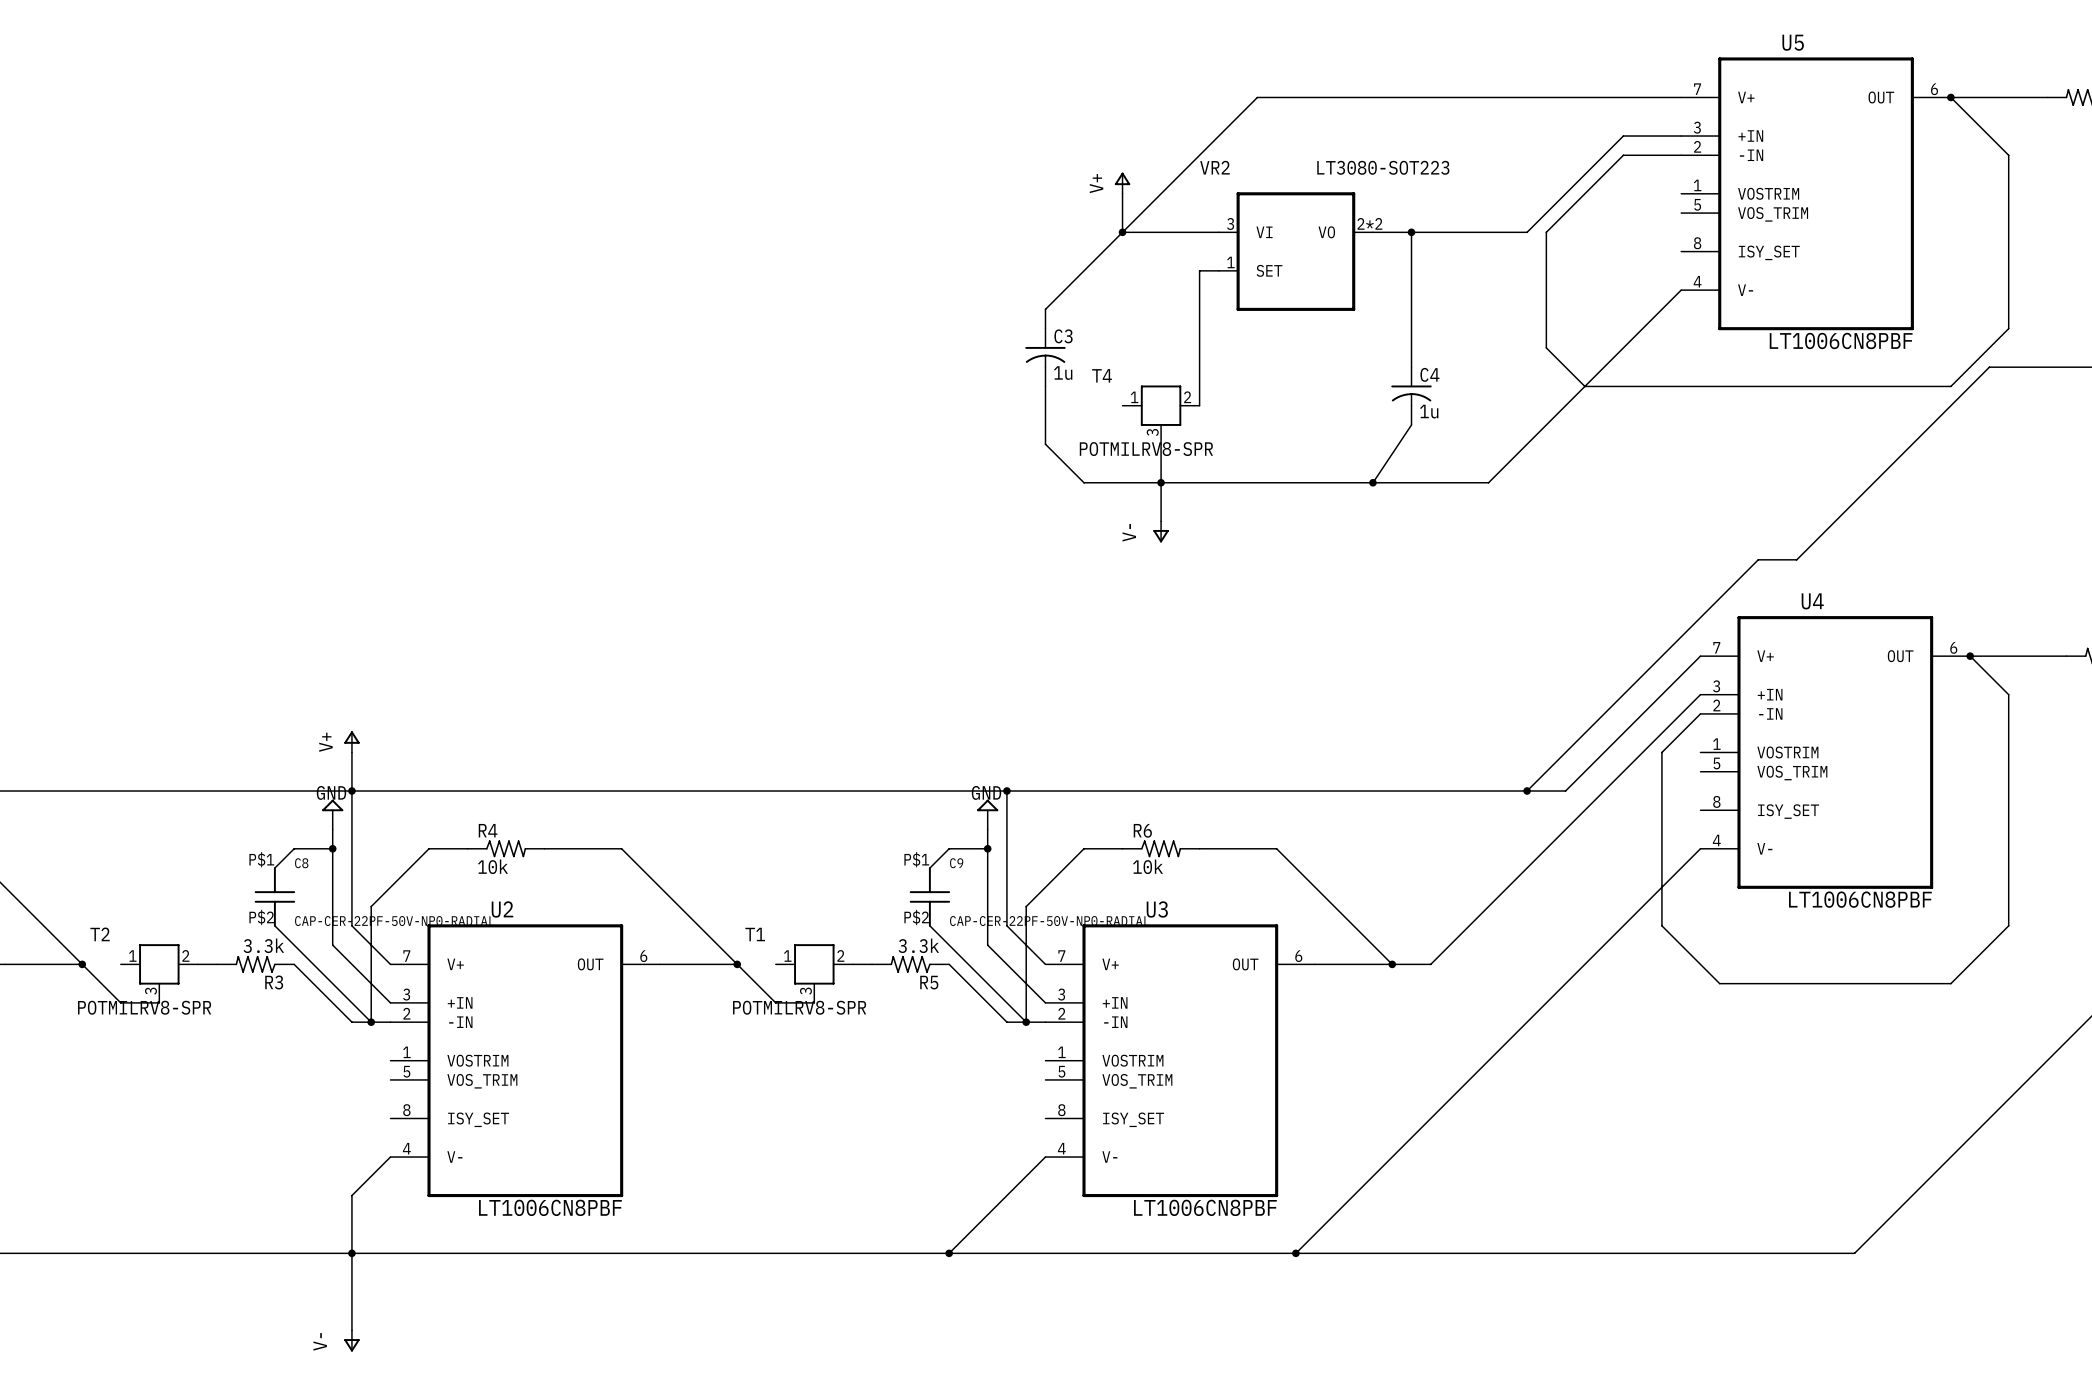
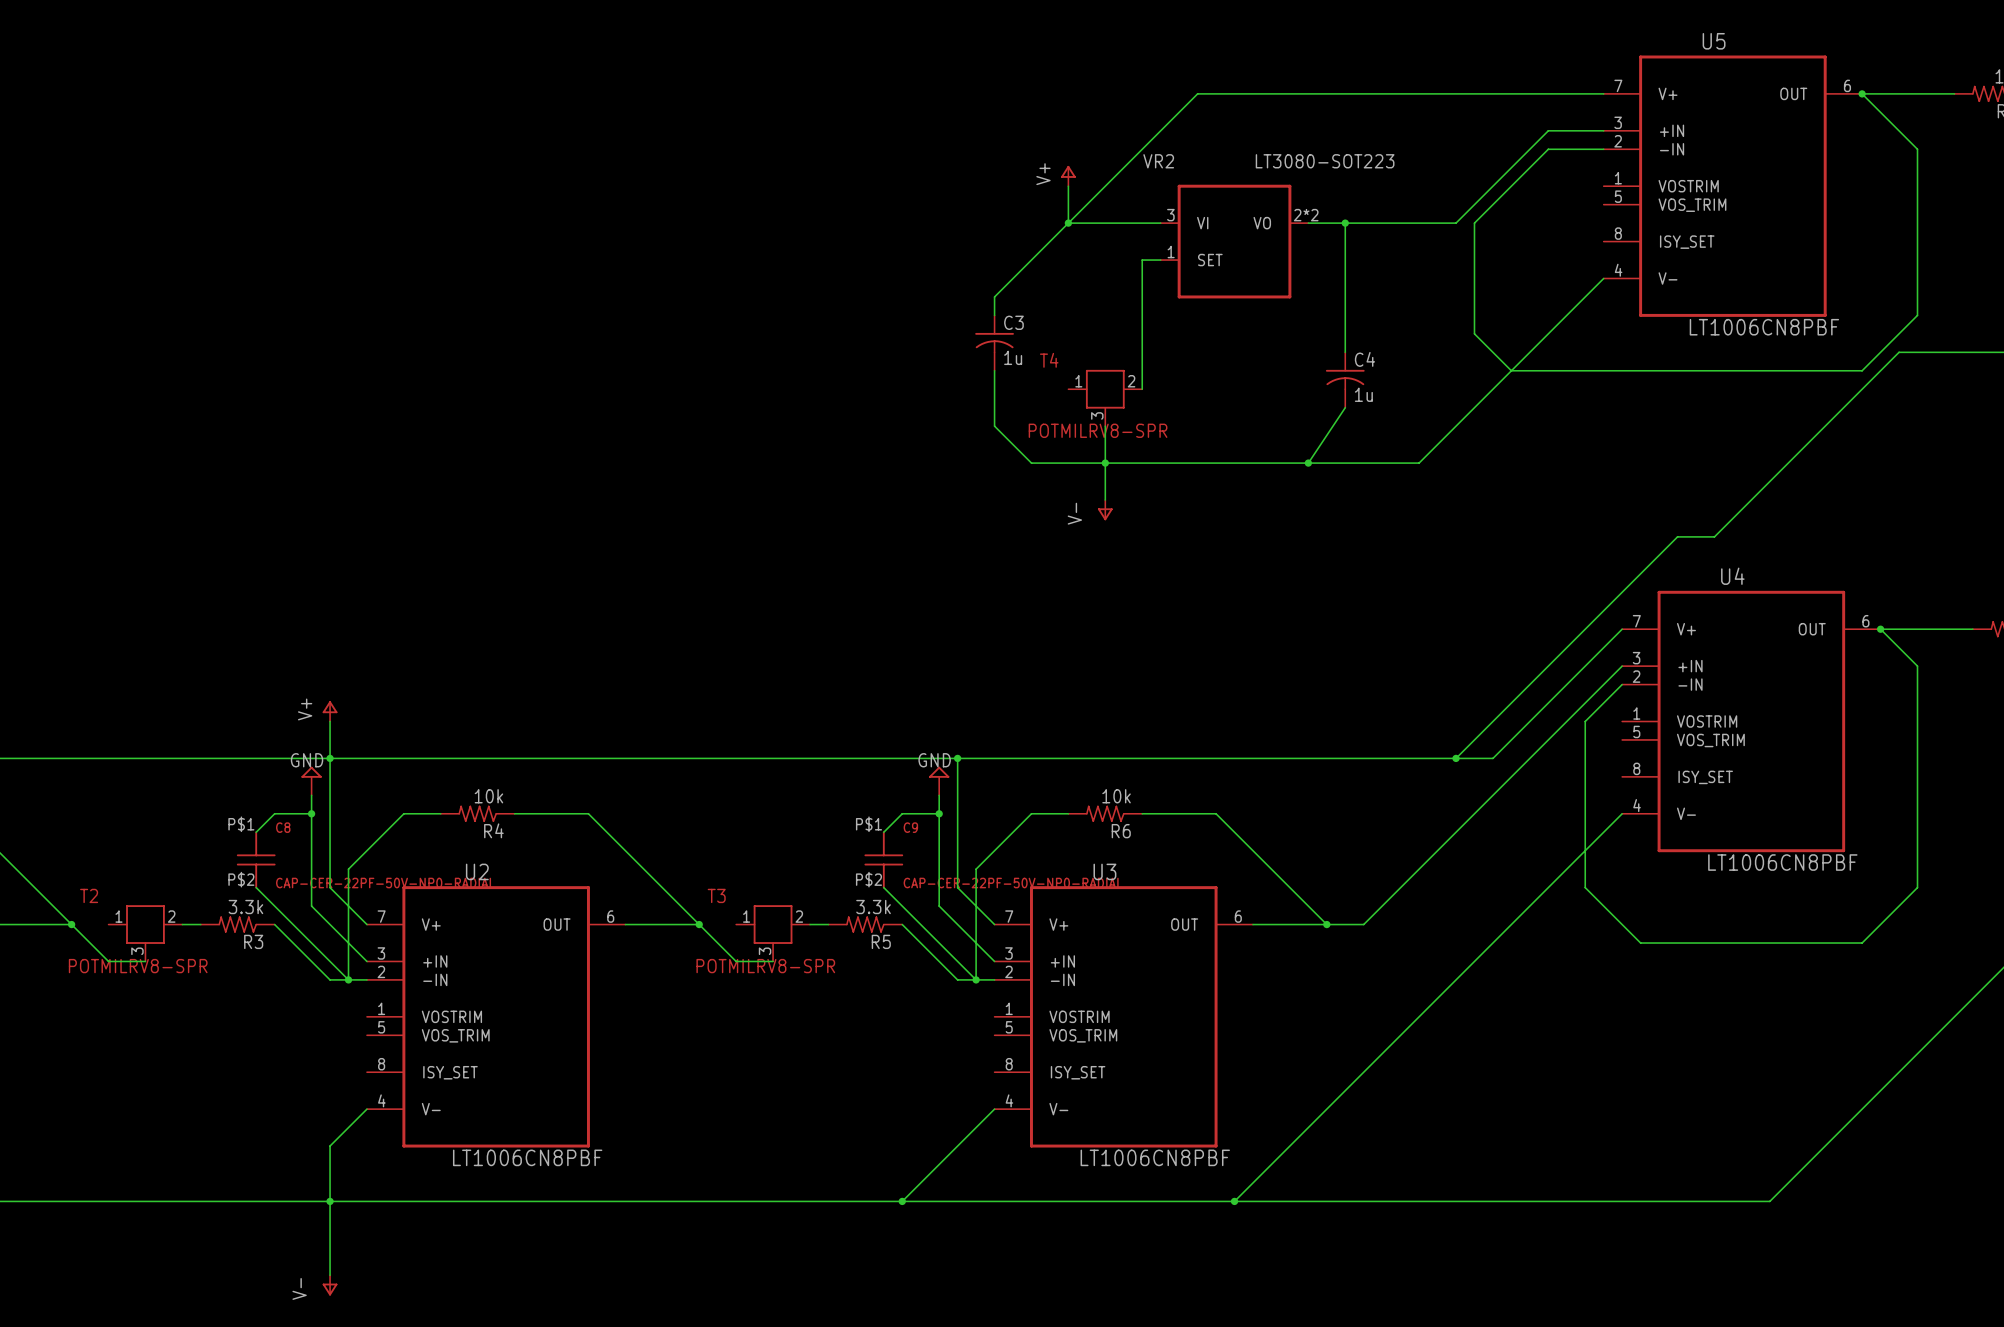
R4 rotation: 0° (506, 848) -> 180° (477, 813)
R6 rotation: 0° (1161, 848) -> 180° (1105, 813)
T1 name: T1 (755, 934) -> T3 (716, 895)

